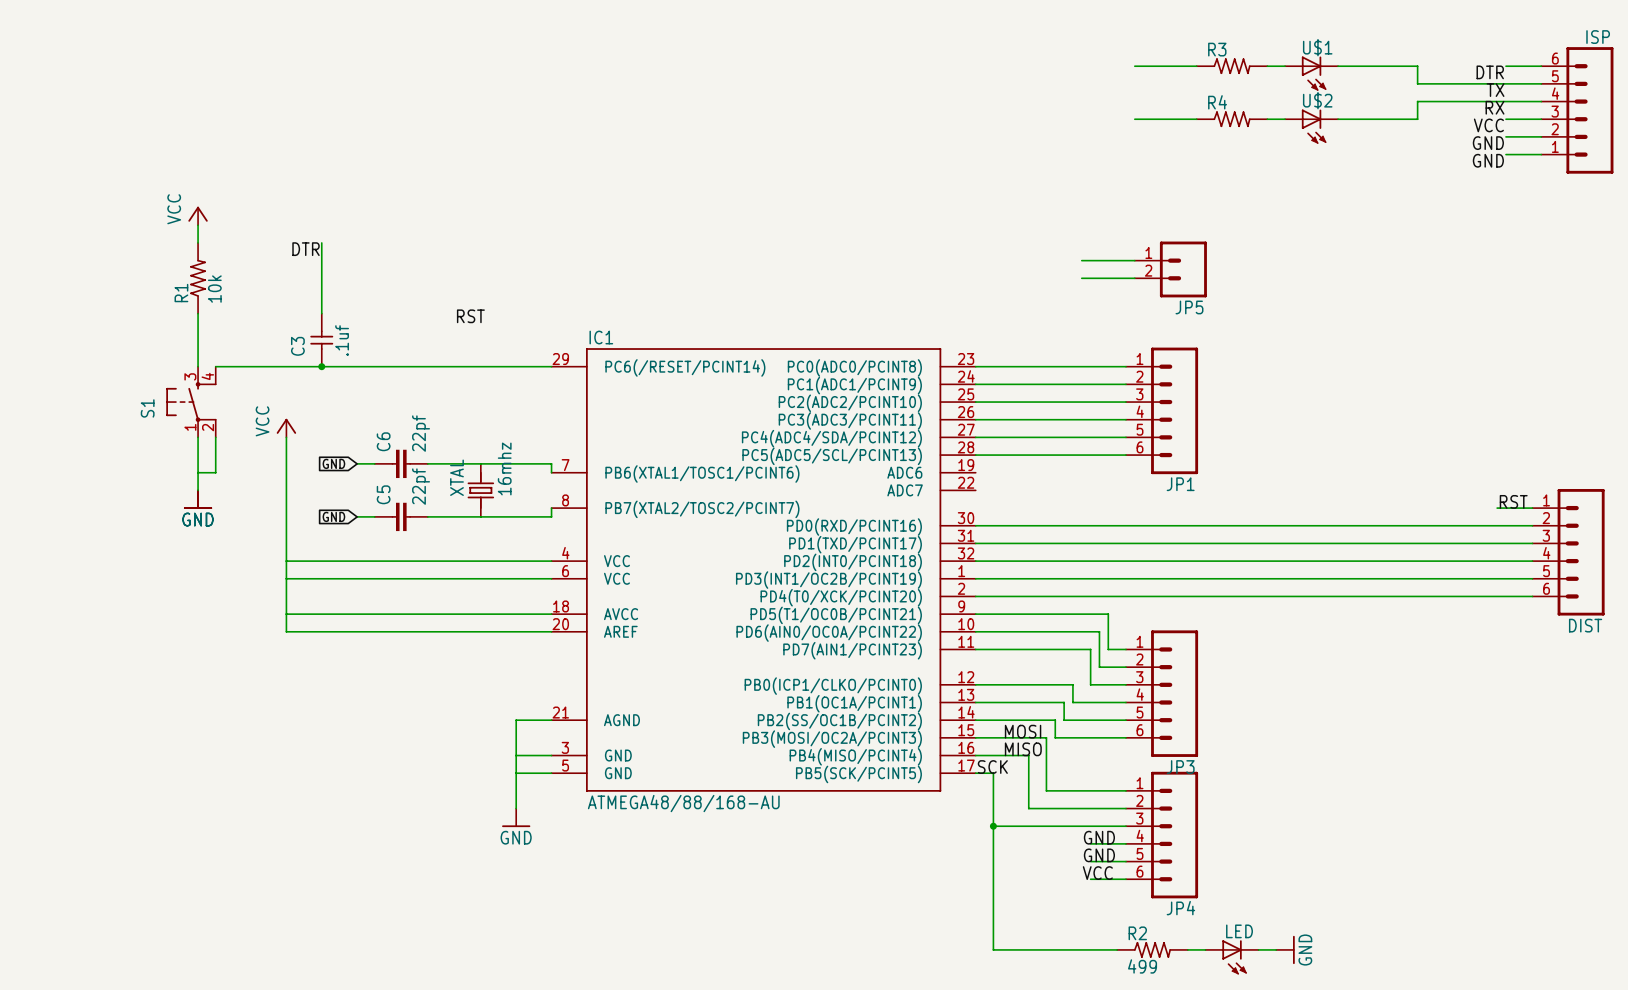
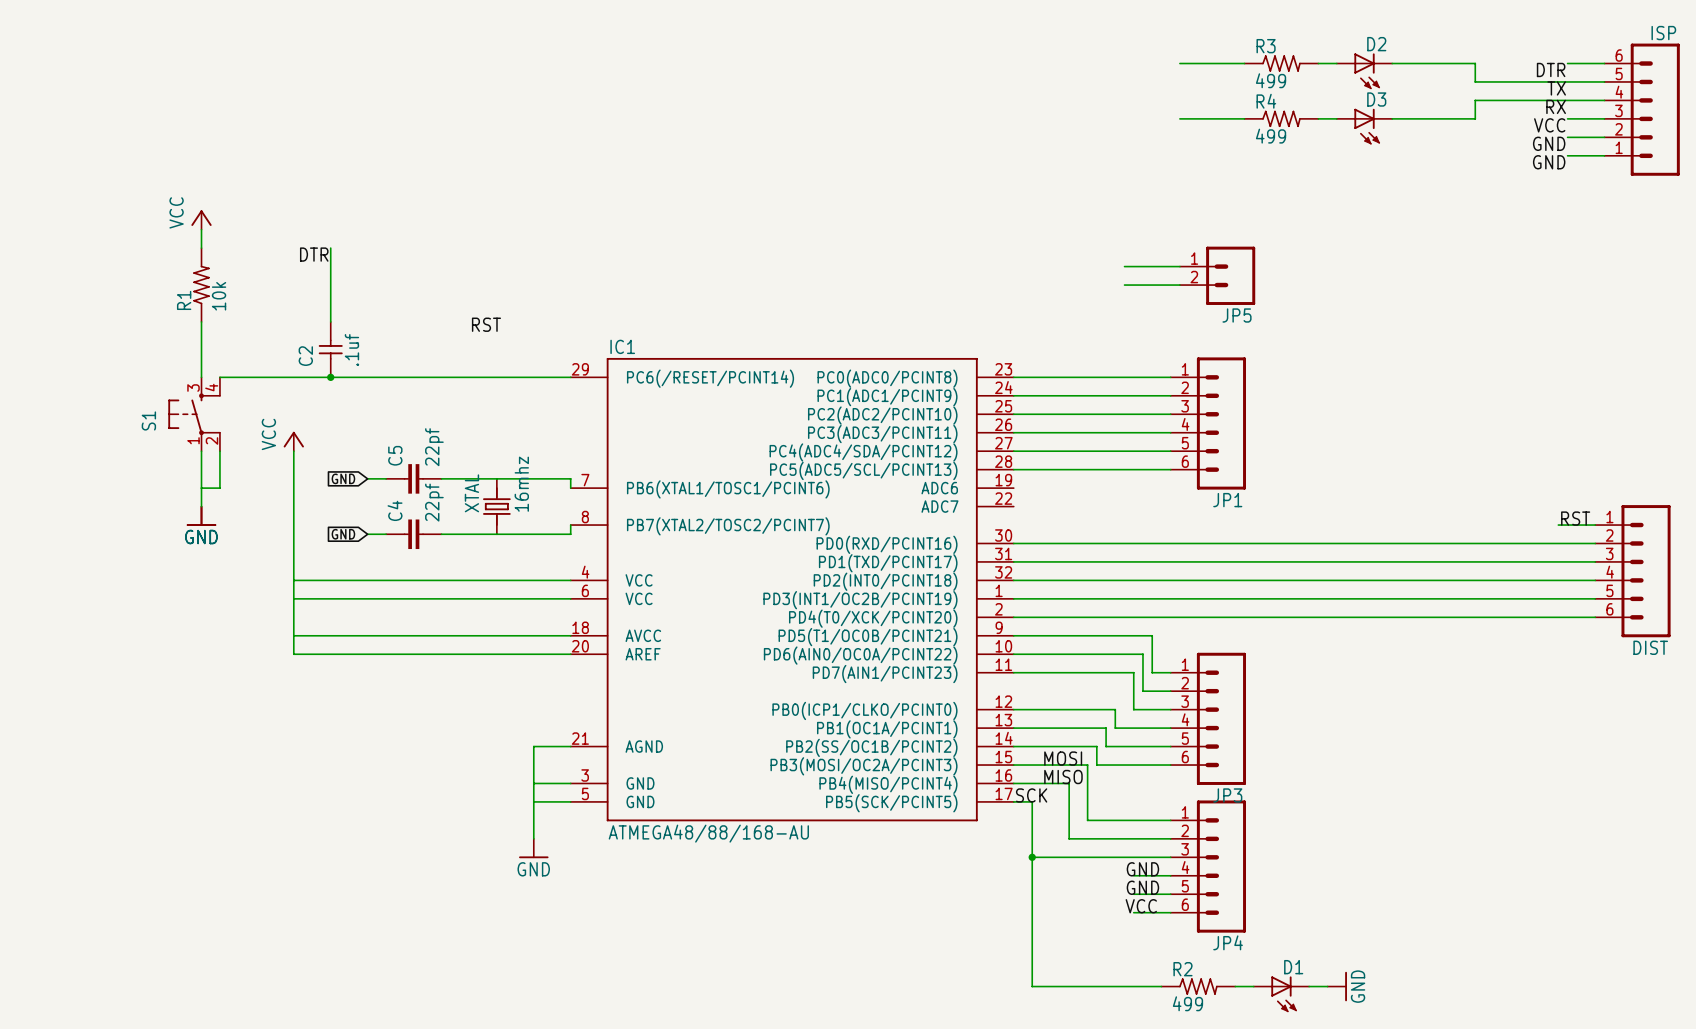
U$1 name: U$1 (1317, 47) -> D2 (1376, 44)
R3 value: none -> 499 (1271, 80)
U$2 name: U$2 (1317, 100) -> D3 (1376, 99)
R4 value: none -> 499 (1271, 136)
C3 name: C3 (297, 346) -> C2 (305, 356)
C6 name: C6 (383, 441) -> C5 (395, 455)
C5 name: C5 (383, 494) -> C4 (395, 510)
LED name: LED (1239, 931) -> D1 (1293, 967)

